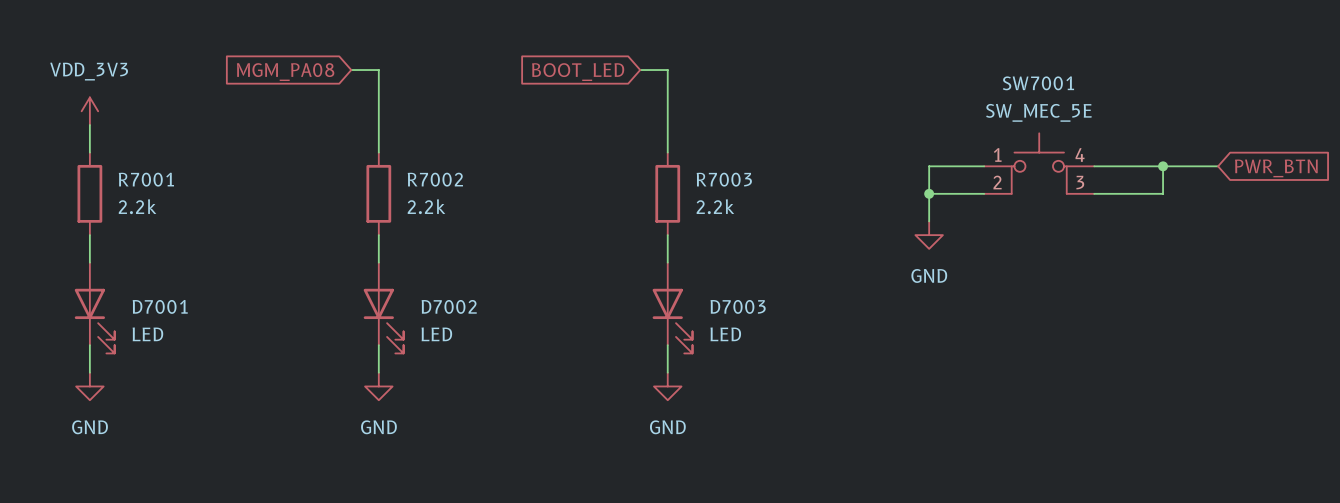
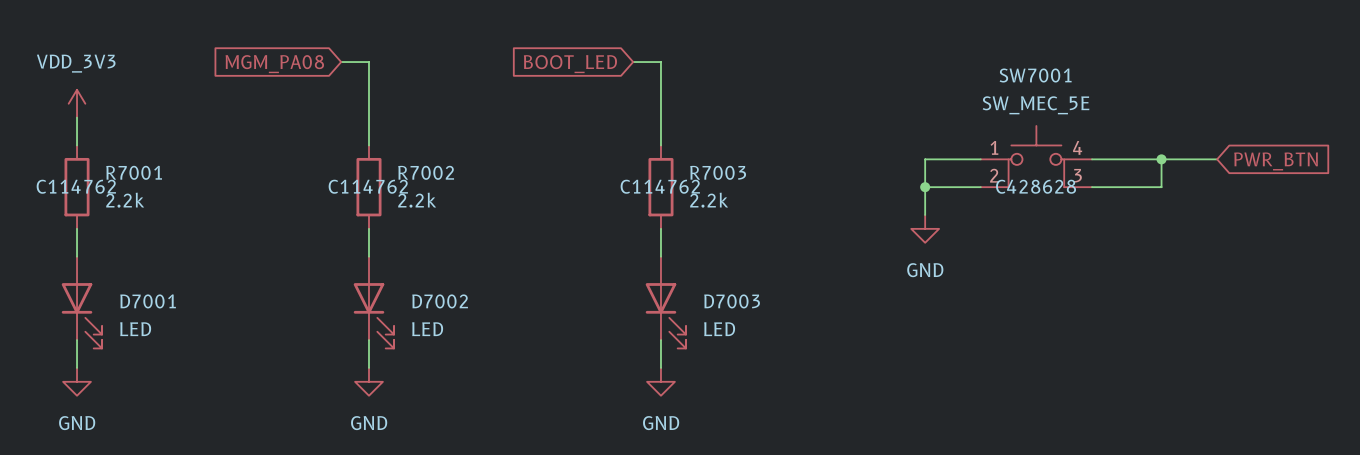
R7001 text: none -> C114762 (76, 186)
R7002 text: none -> C114762 (368, 186)
R7003 text: none -> C114762 (660, 186)
SW7001 text: none -> C428628 (1036, 186)

